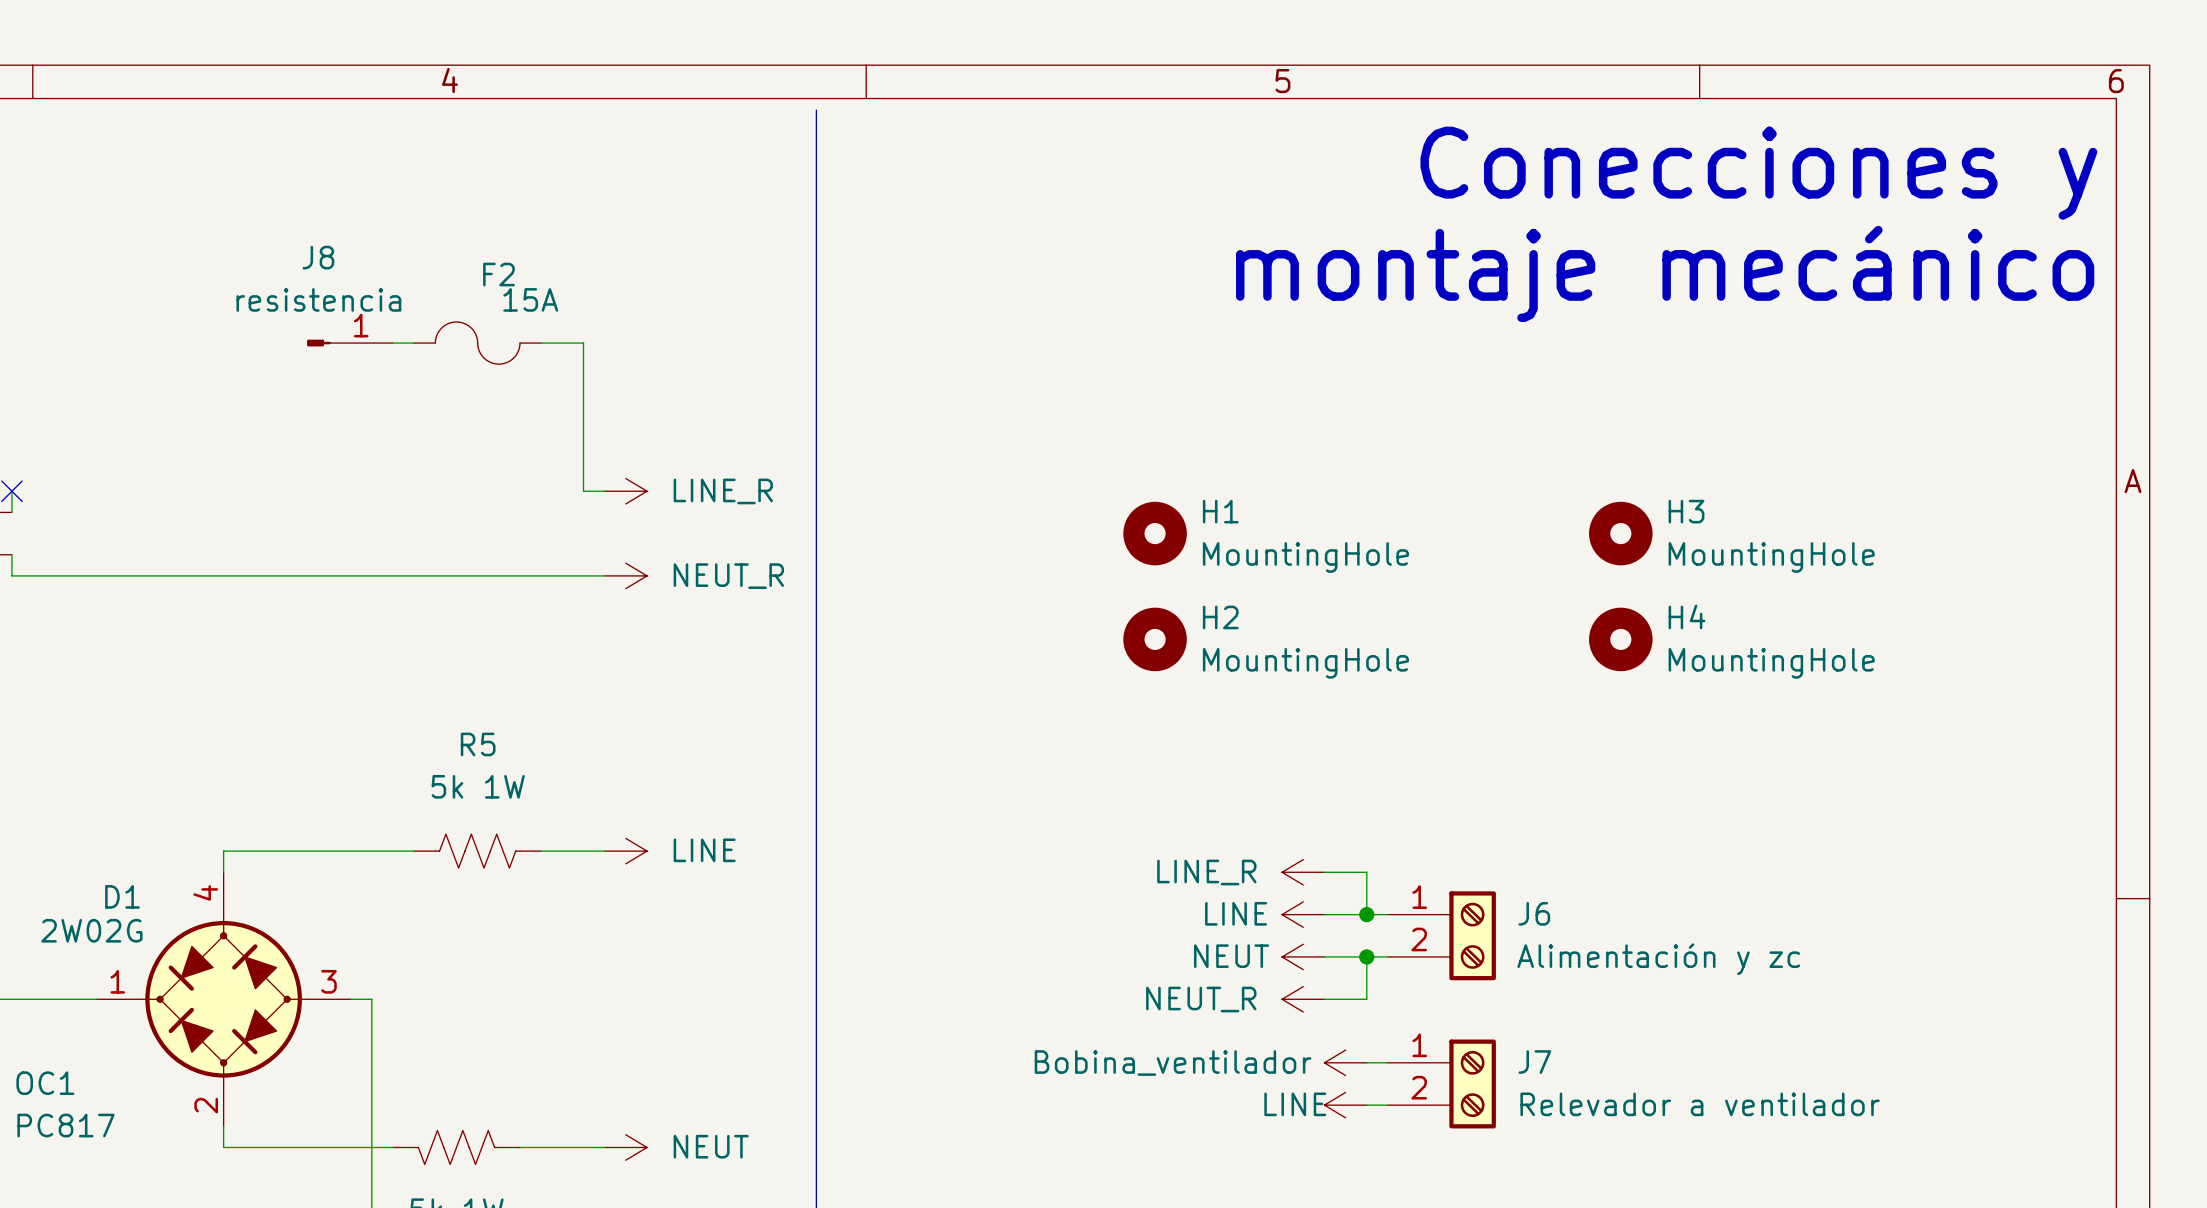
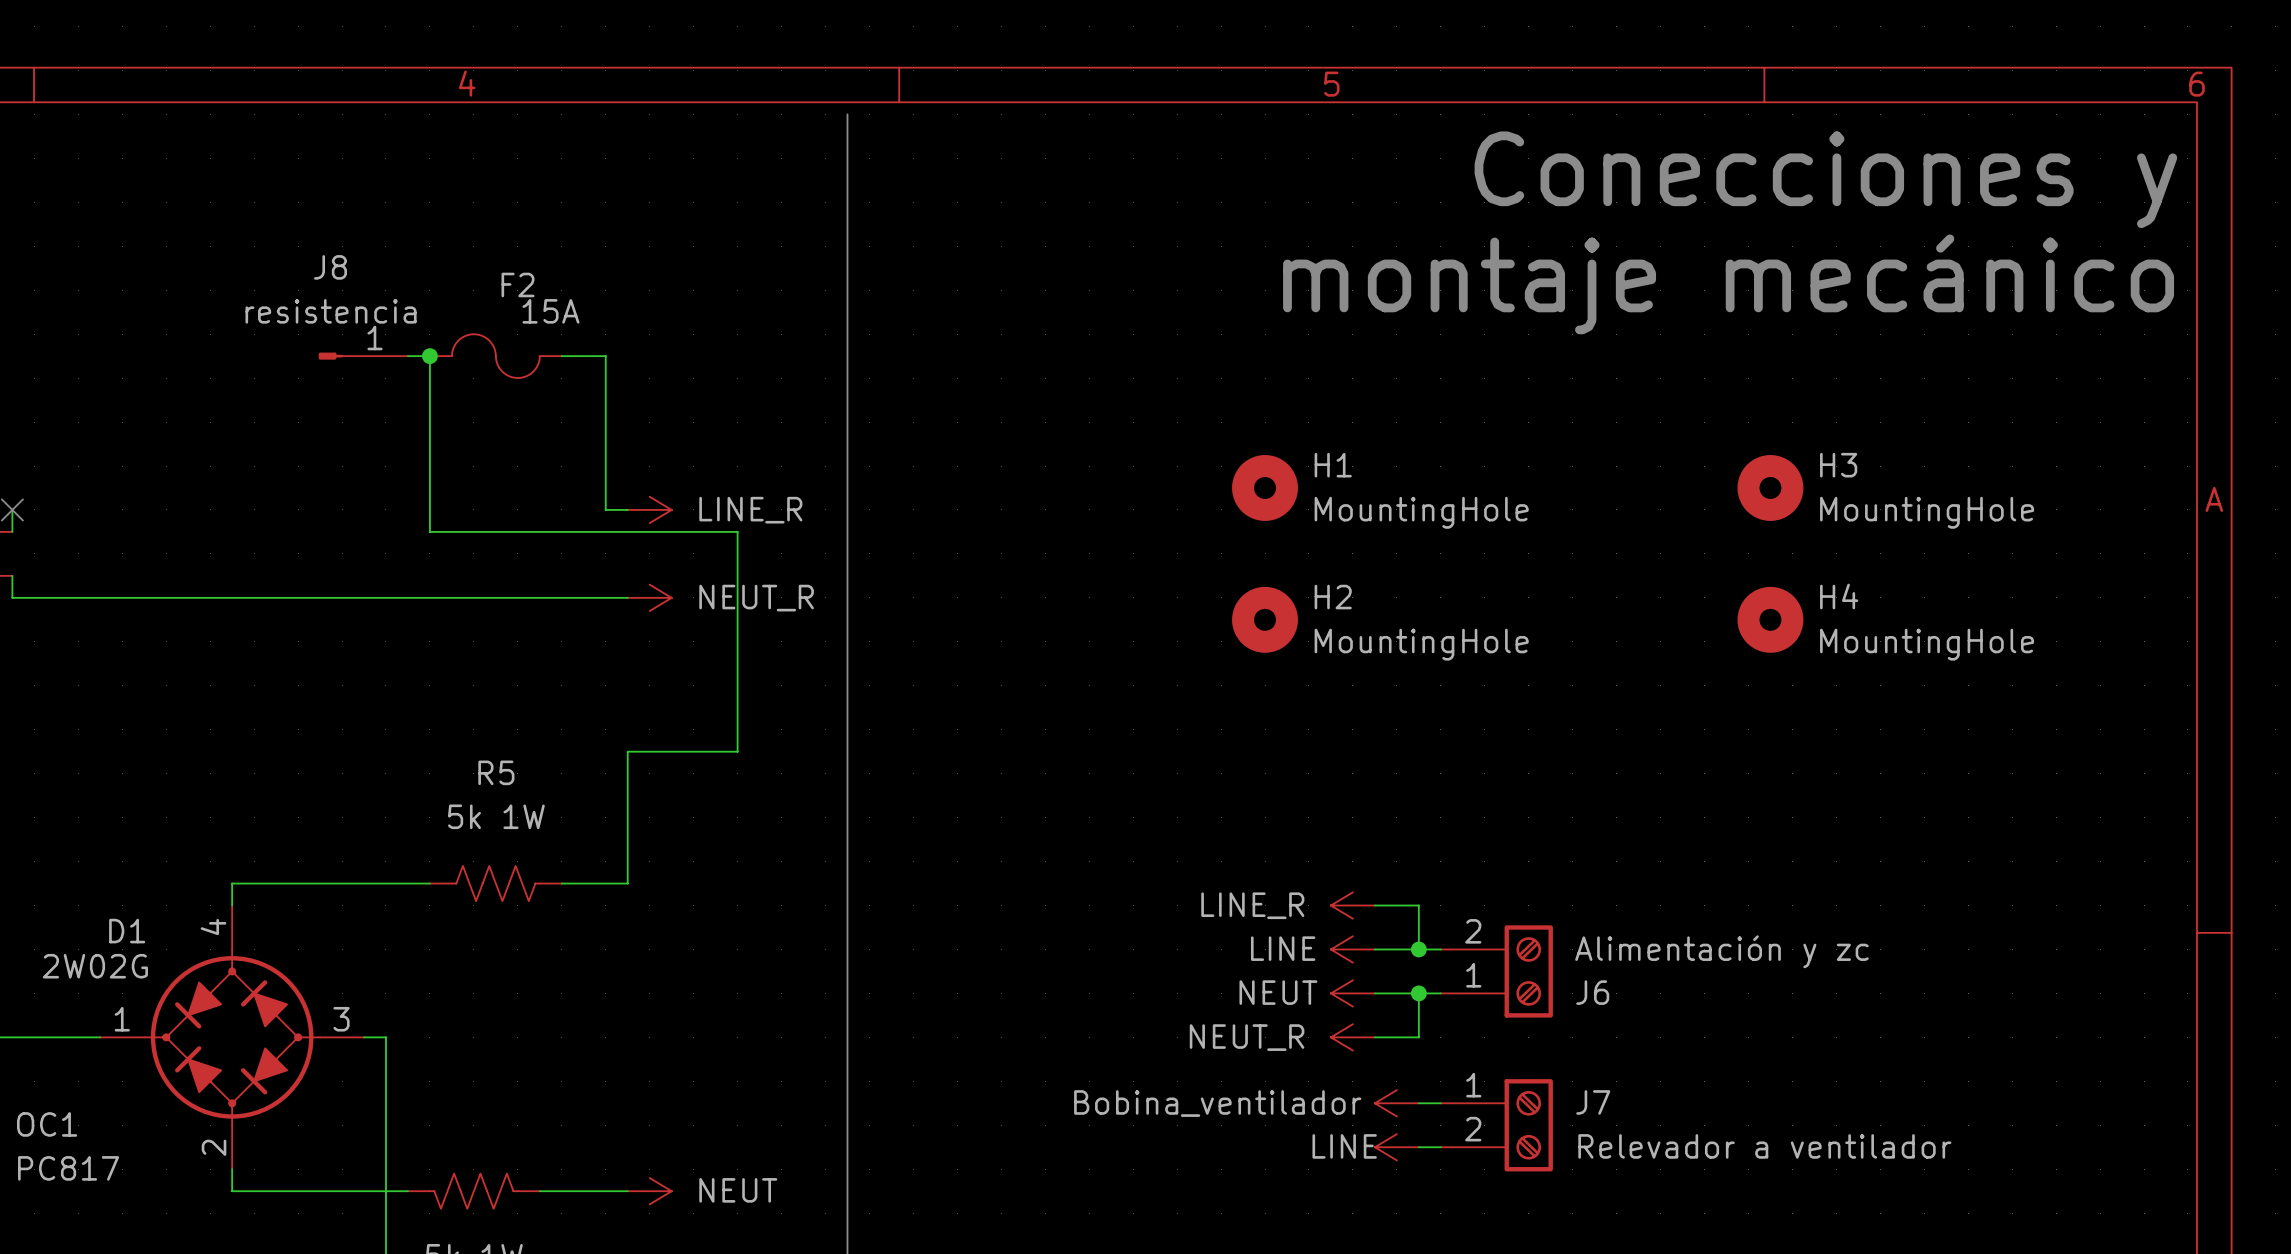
wire: none -> (429, 356) (429, 531) (737, 531) (737, 751) (627, 751) (627, 883)
junction: none -> (429, 356)
H1 position: (1155, 533) -> (1265, 487)
H3 position: (1620, 533) -> (1770, 487)
H2 position: (1155, 639) -> (1265, 619)
H4 position: (1620, 639) -> (1770, 619)
power symbol: LINE (625, 851) -> none
J6 flip: as is (1472, 935) -> up-down (1528, 971)

